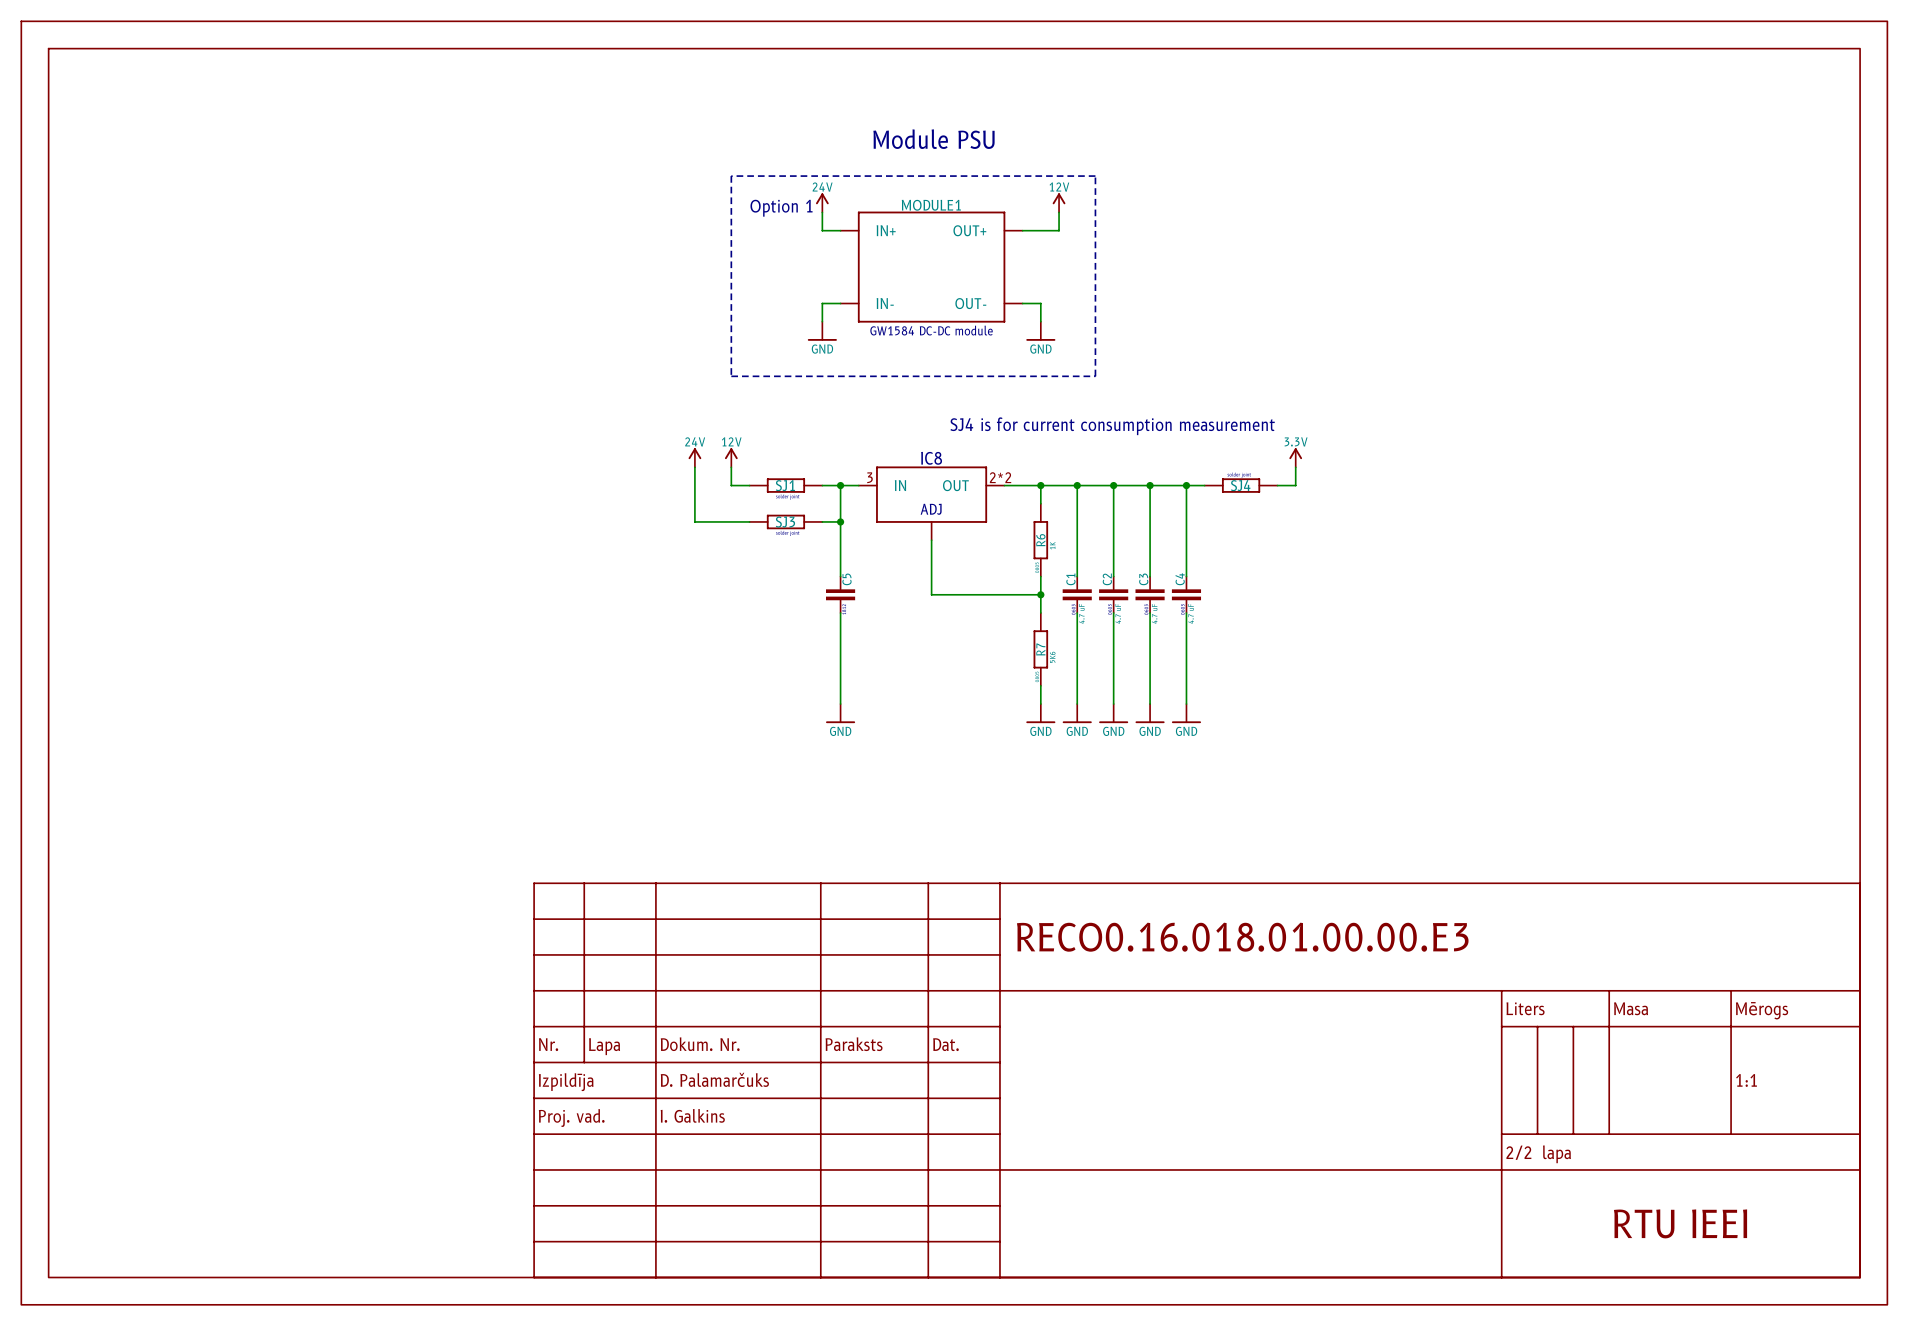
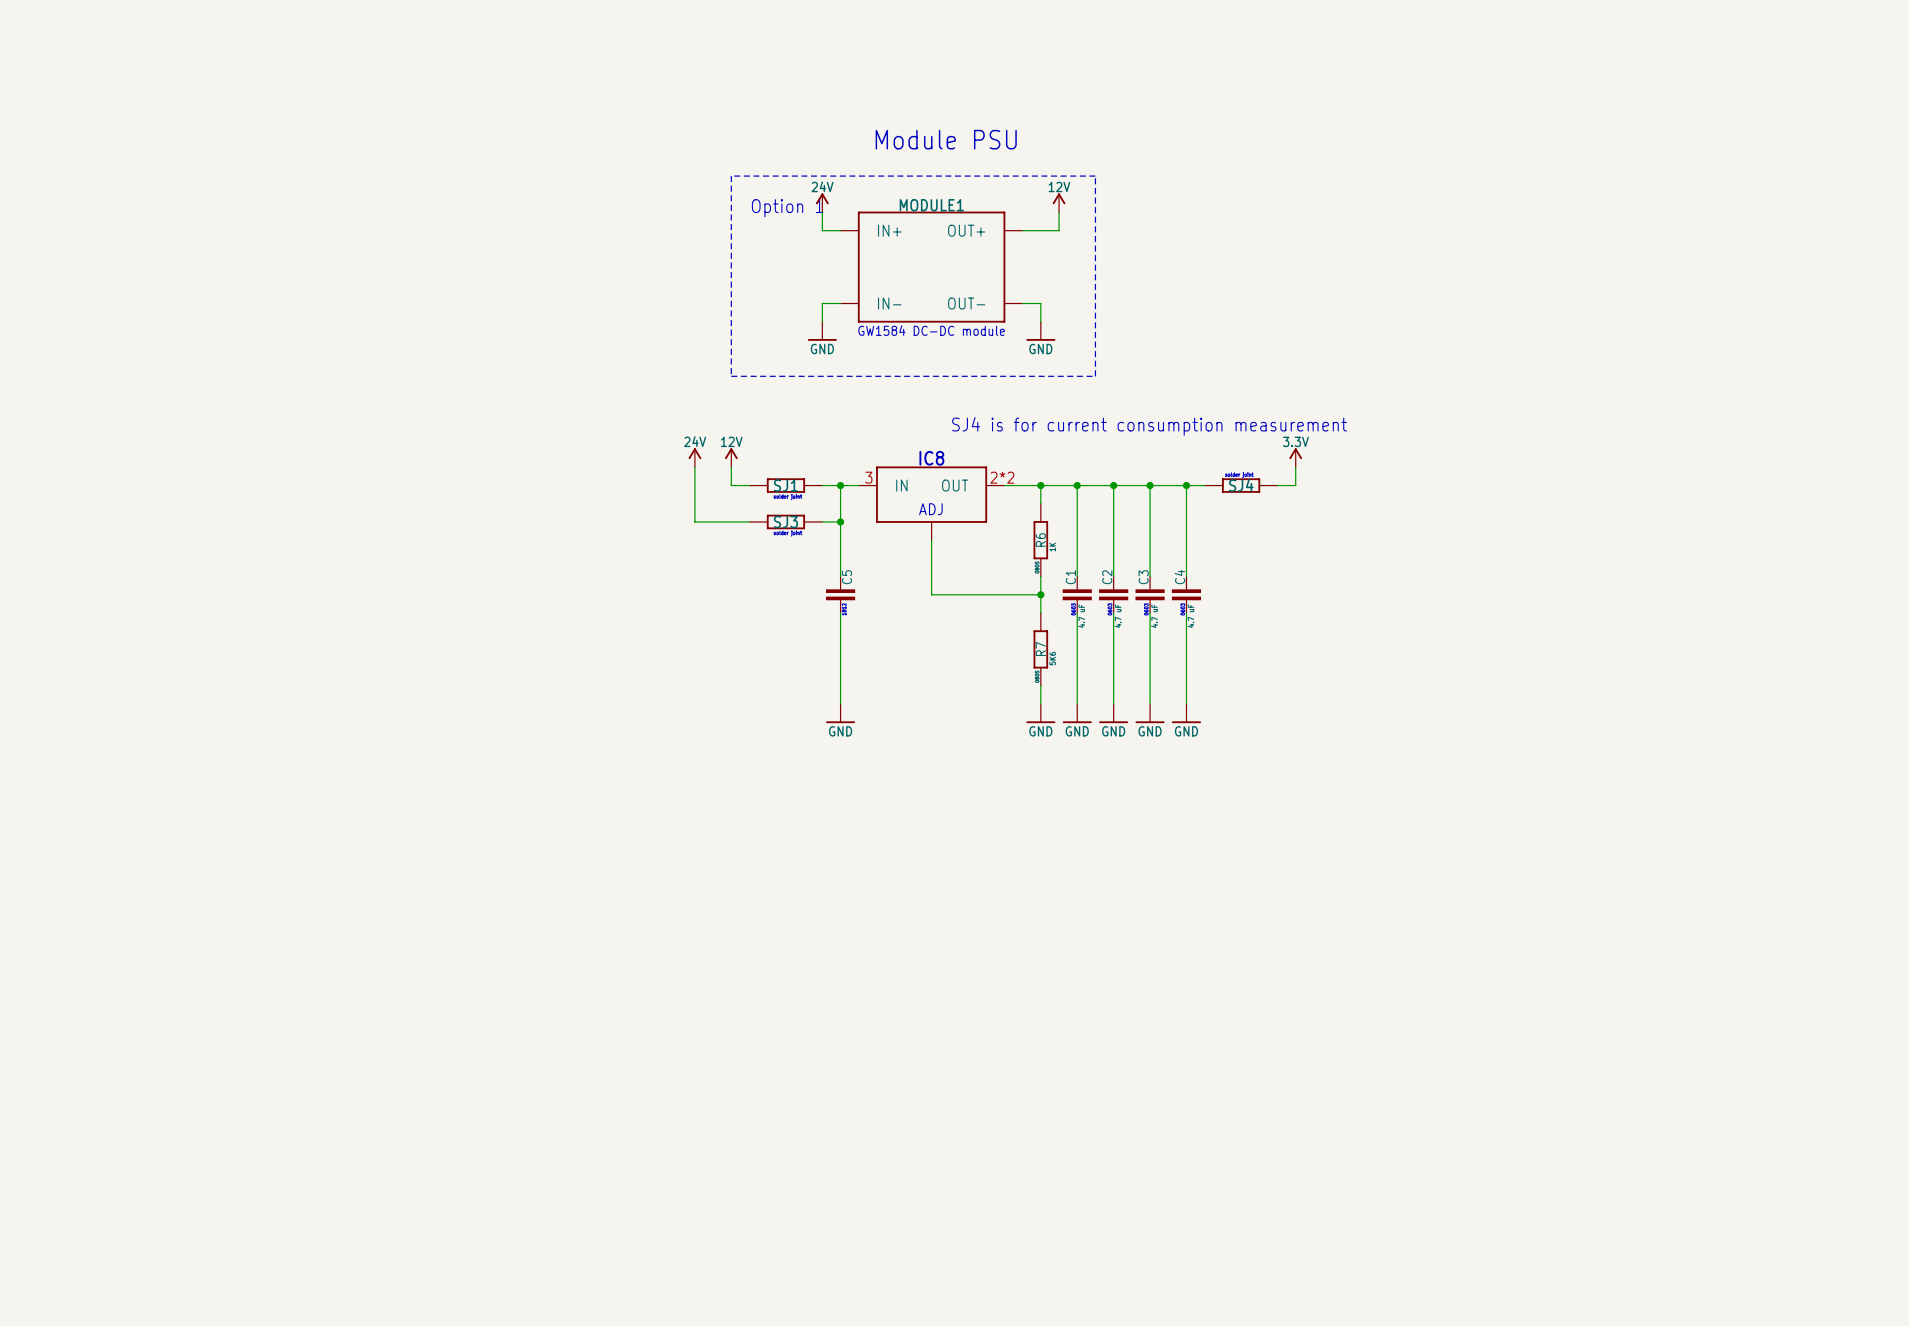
part: (954, 663) -> none

